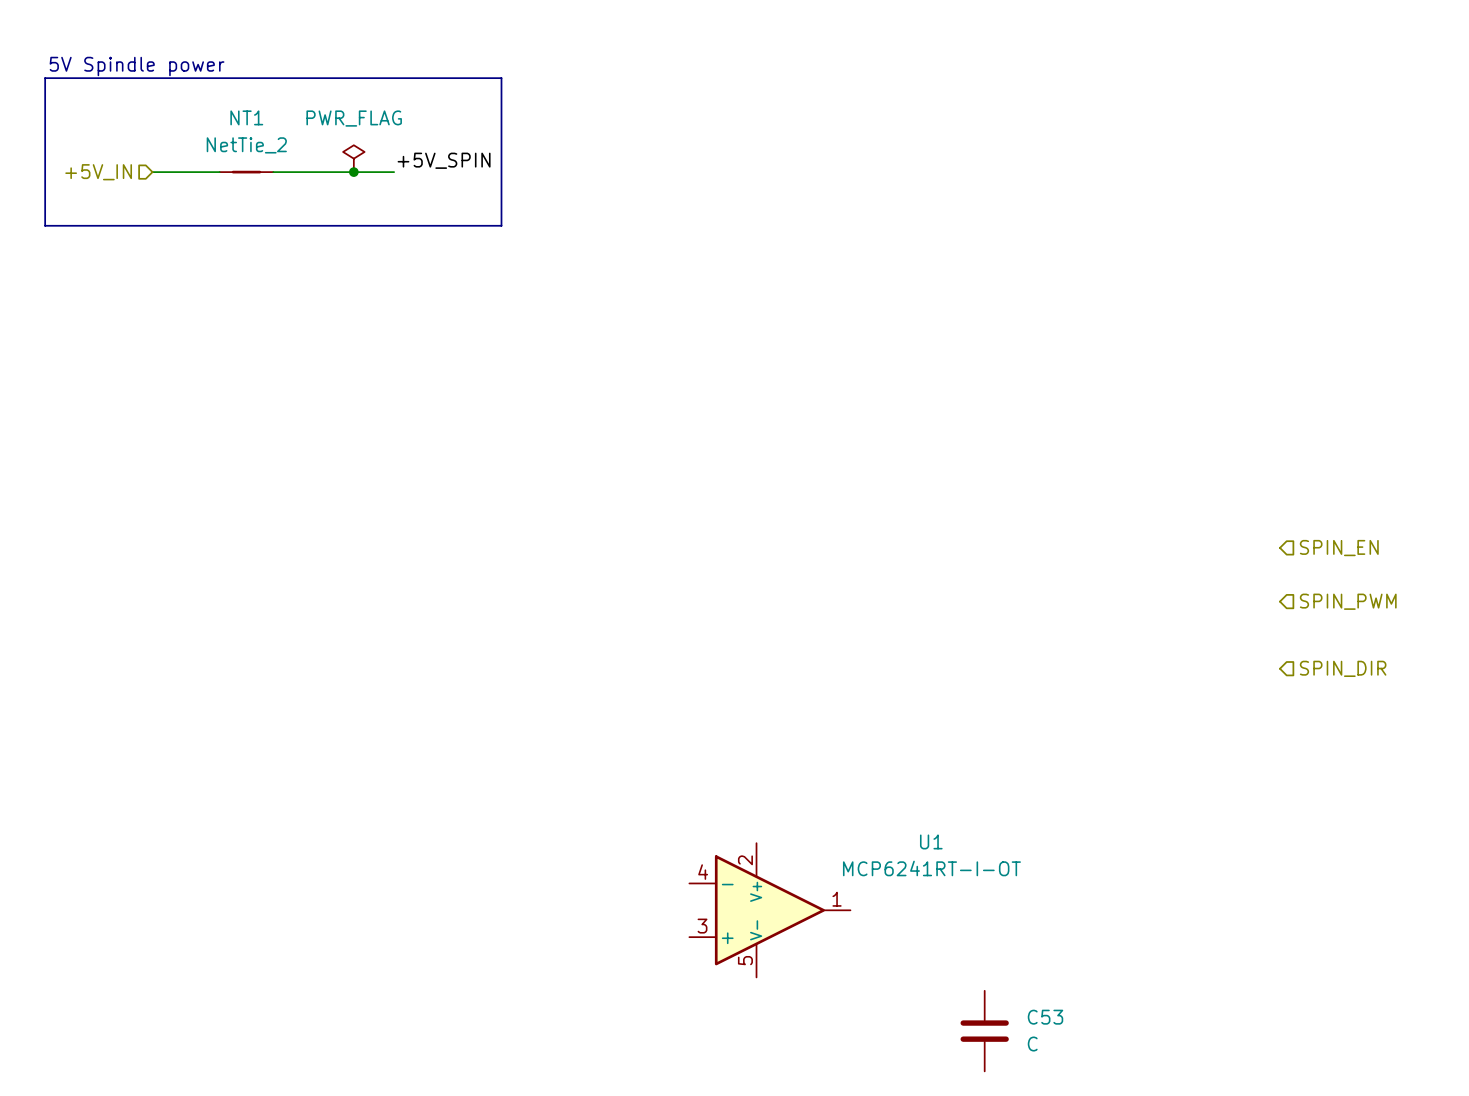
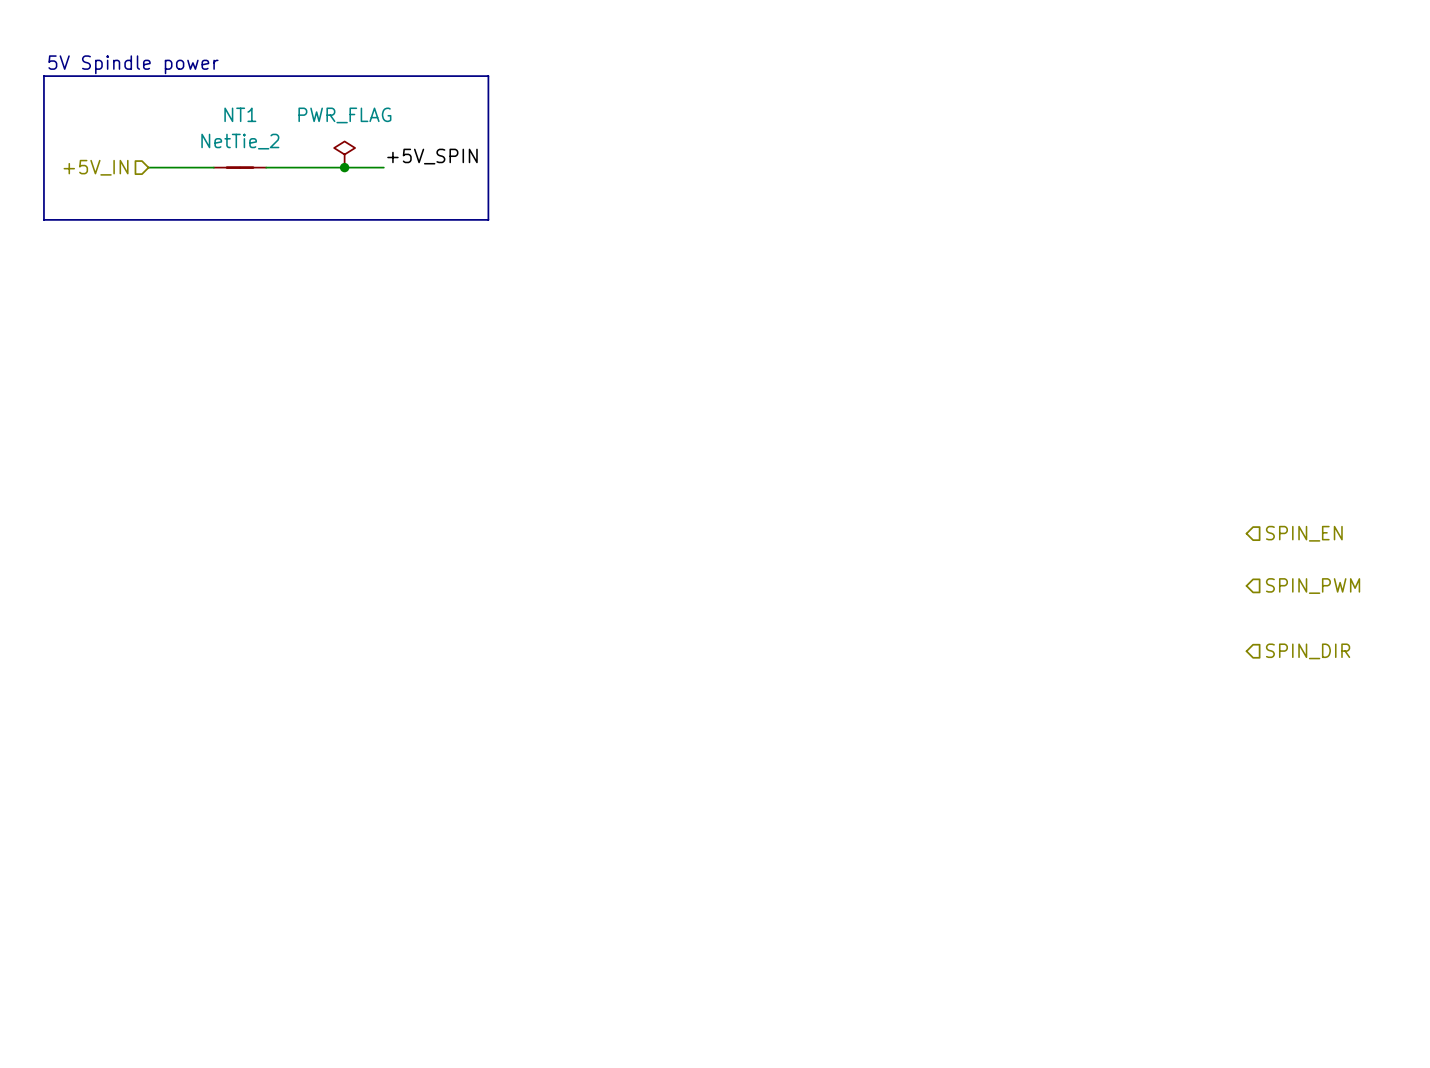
U1: MCP6241RT-I-OT (769, 910) -> none
C53: C (984, 1031) -> none

